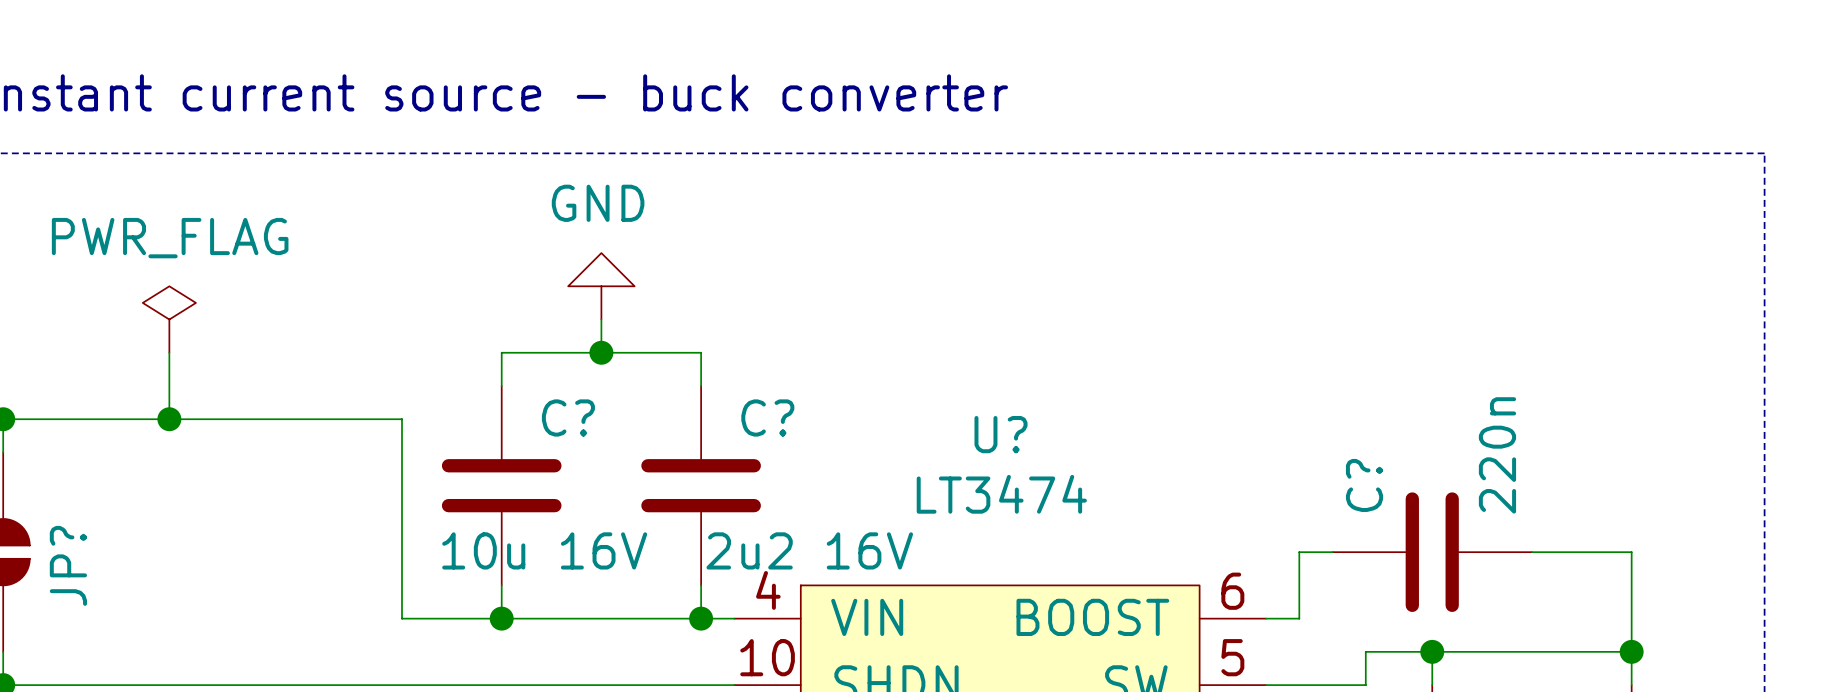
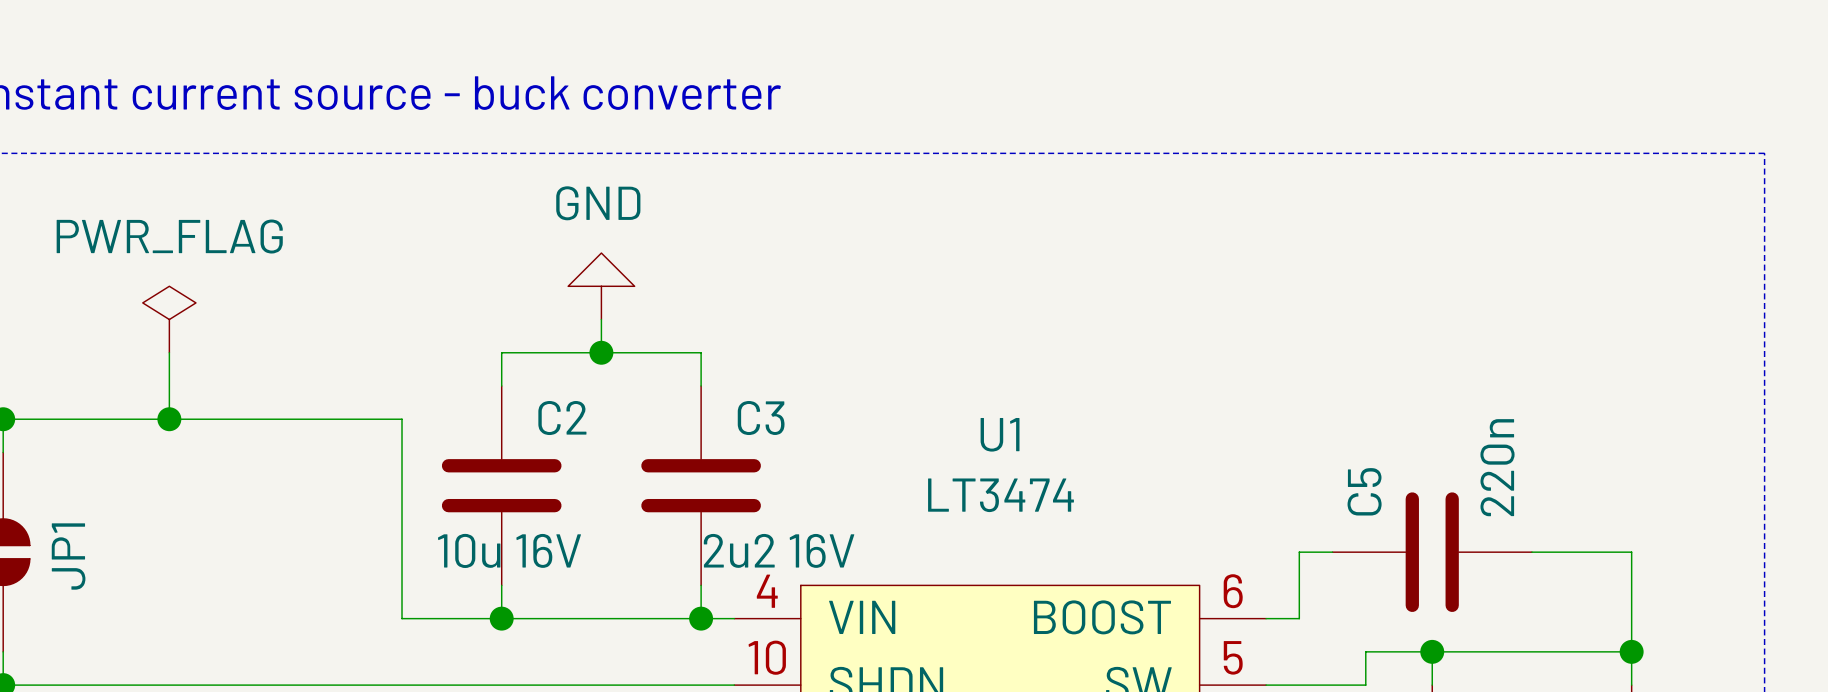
C? name: C? (568, 417) -> C2 (562, 418)
C? name: C? (767, 417) -> C3 (761, 418)
U? name: U? (1001, 434) -> U1 (1000, 434)
C? name: C? (1364, 485) -> C5 (1364, 491)
JP? name: JP? (68, 565) -> JP1 (68, 556)

